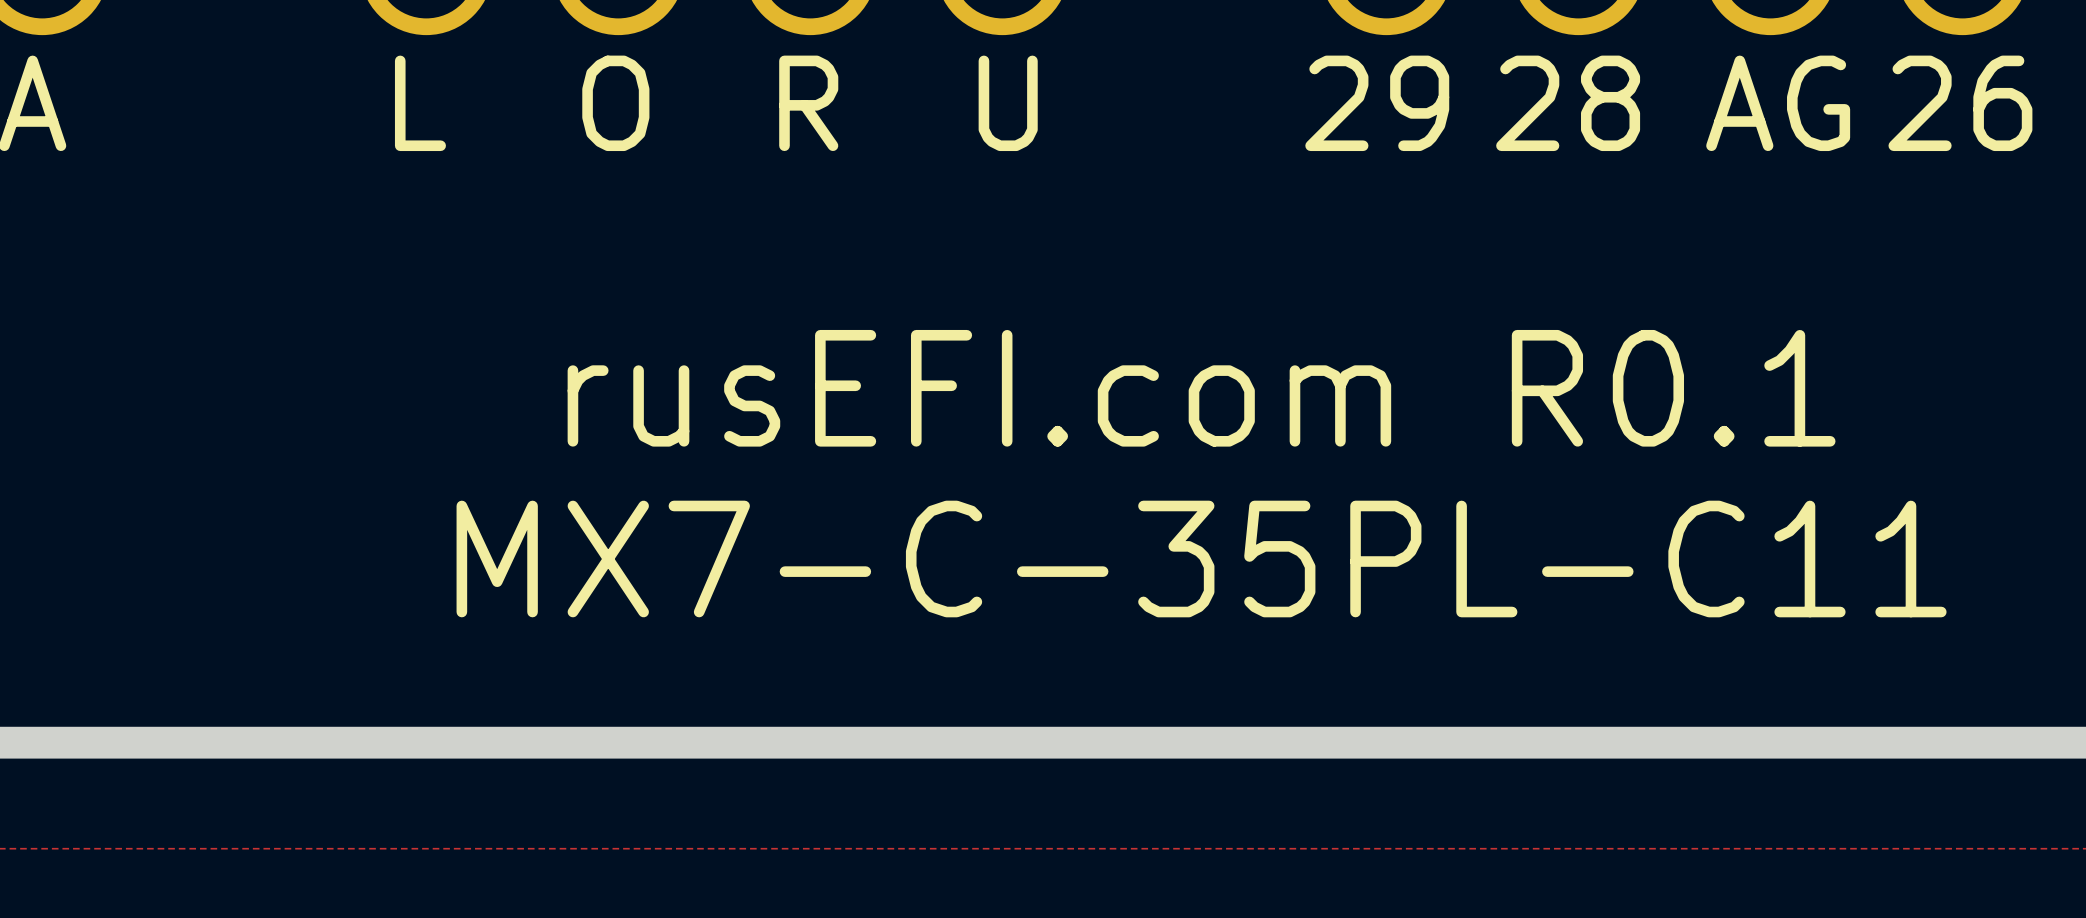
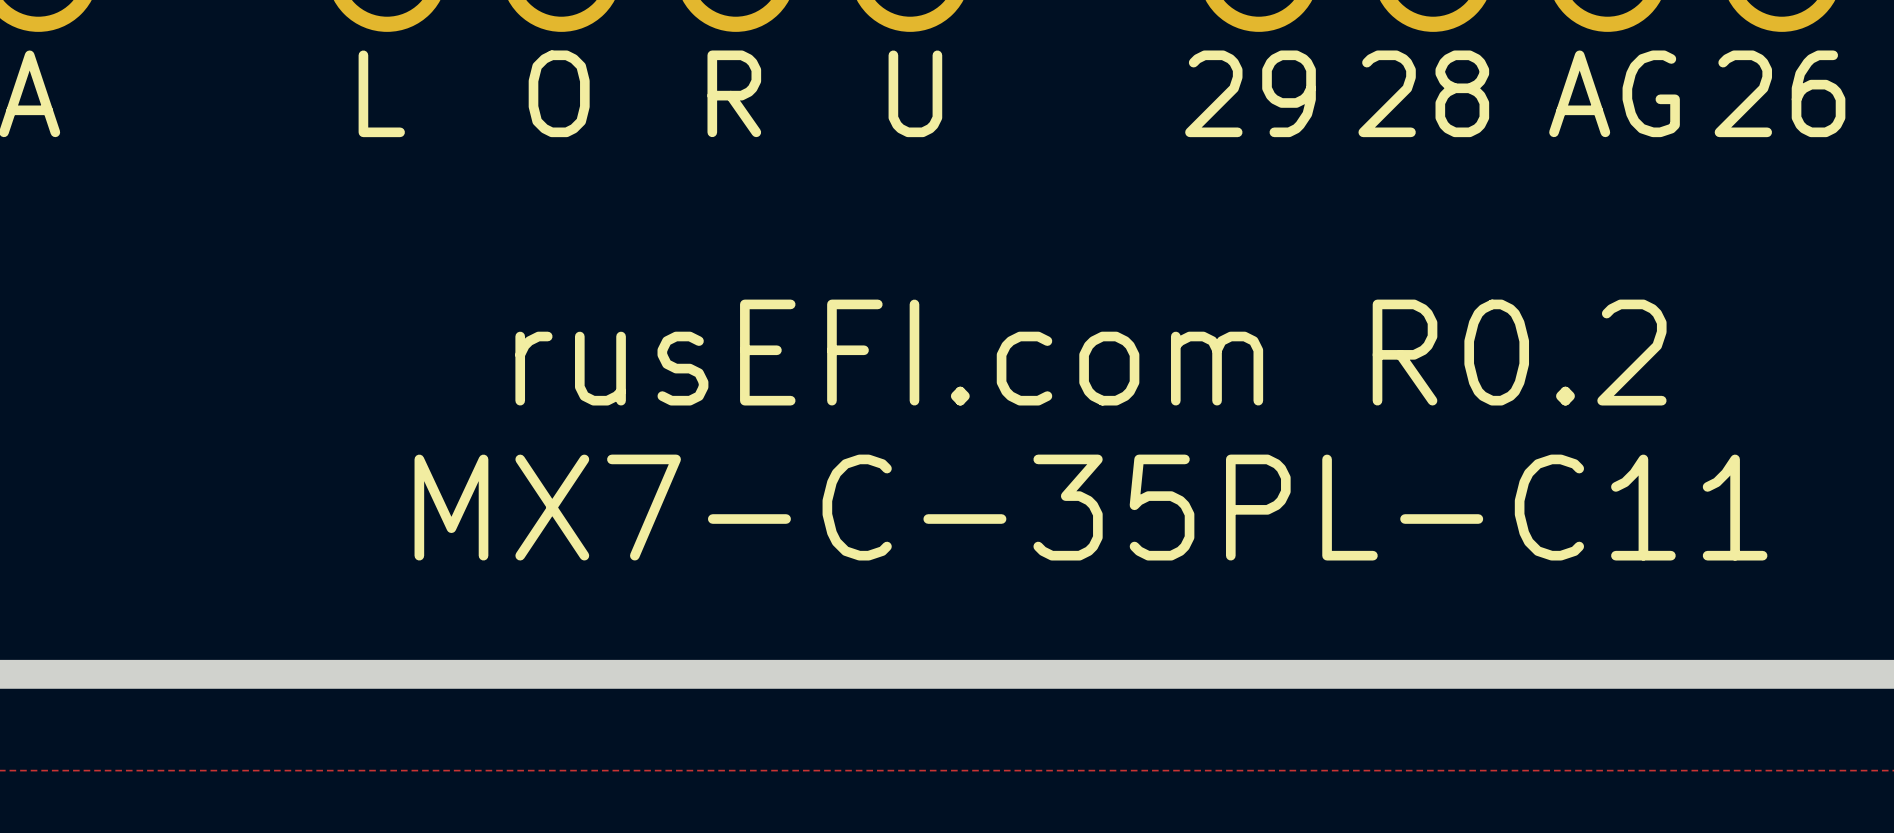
text: rusEFI.com R0.1 (1201, 388) -> rusEFI.com R0.2 (1090, 352)

